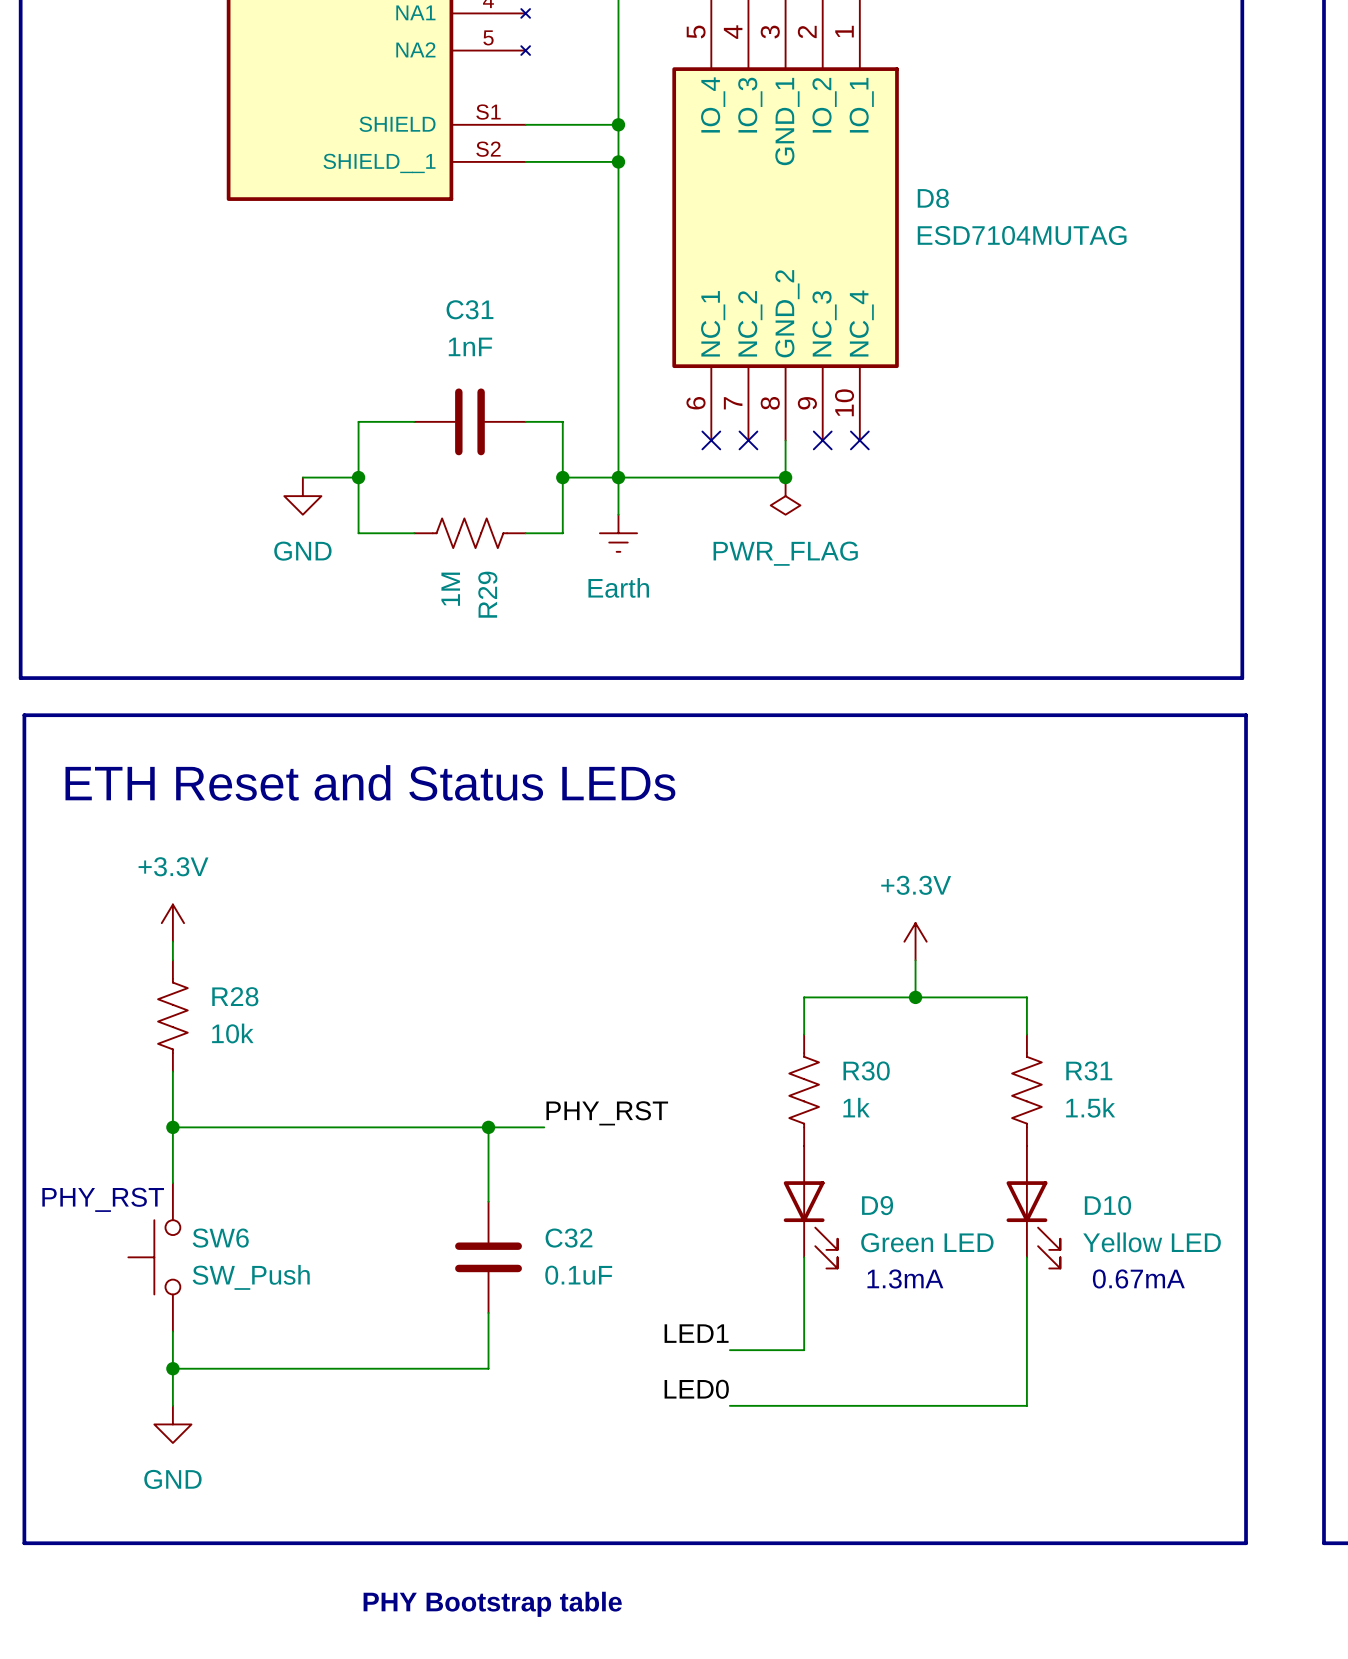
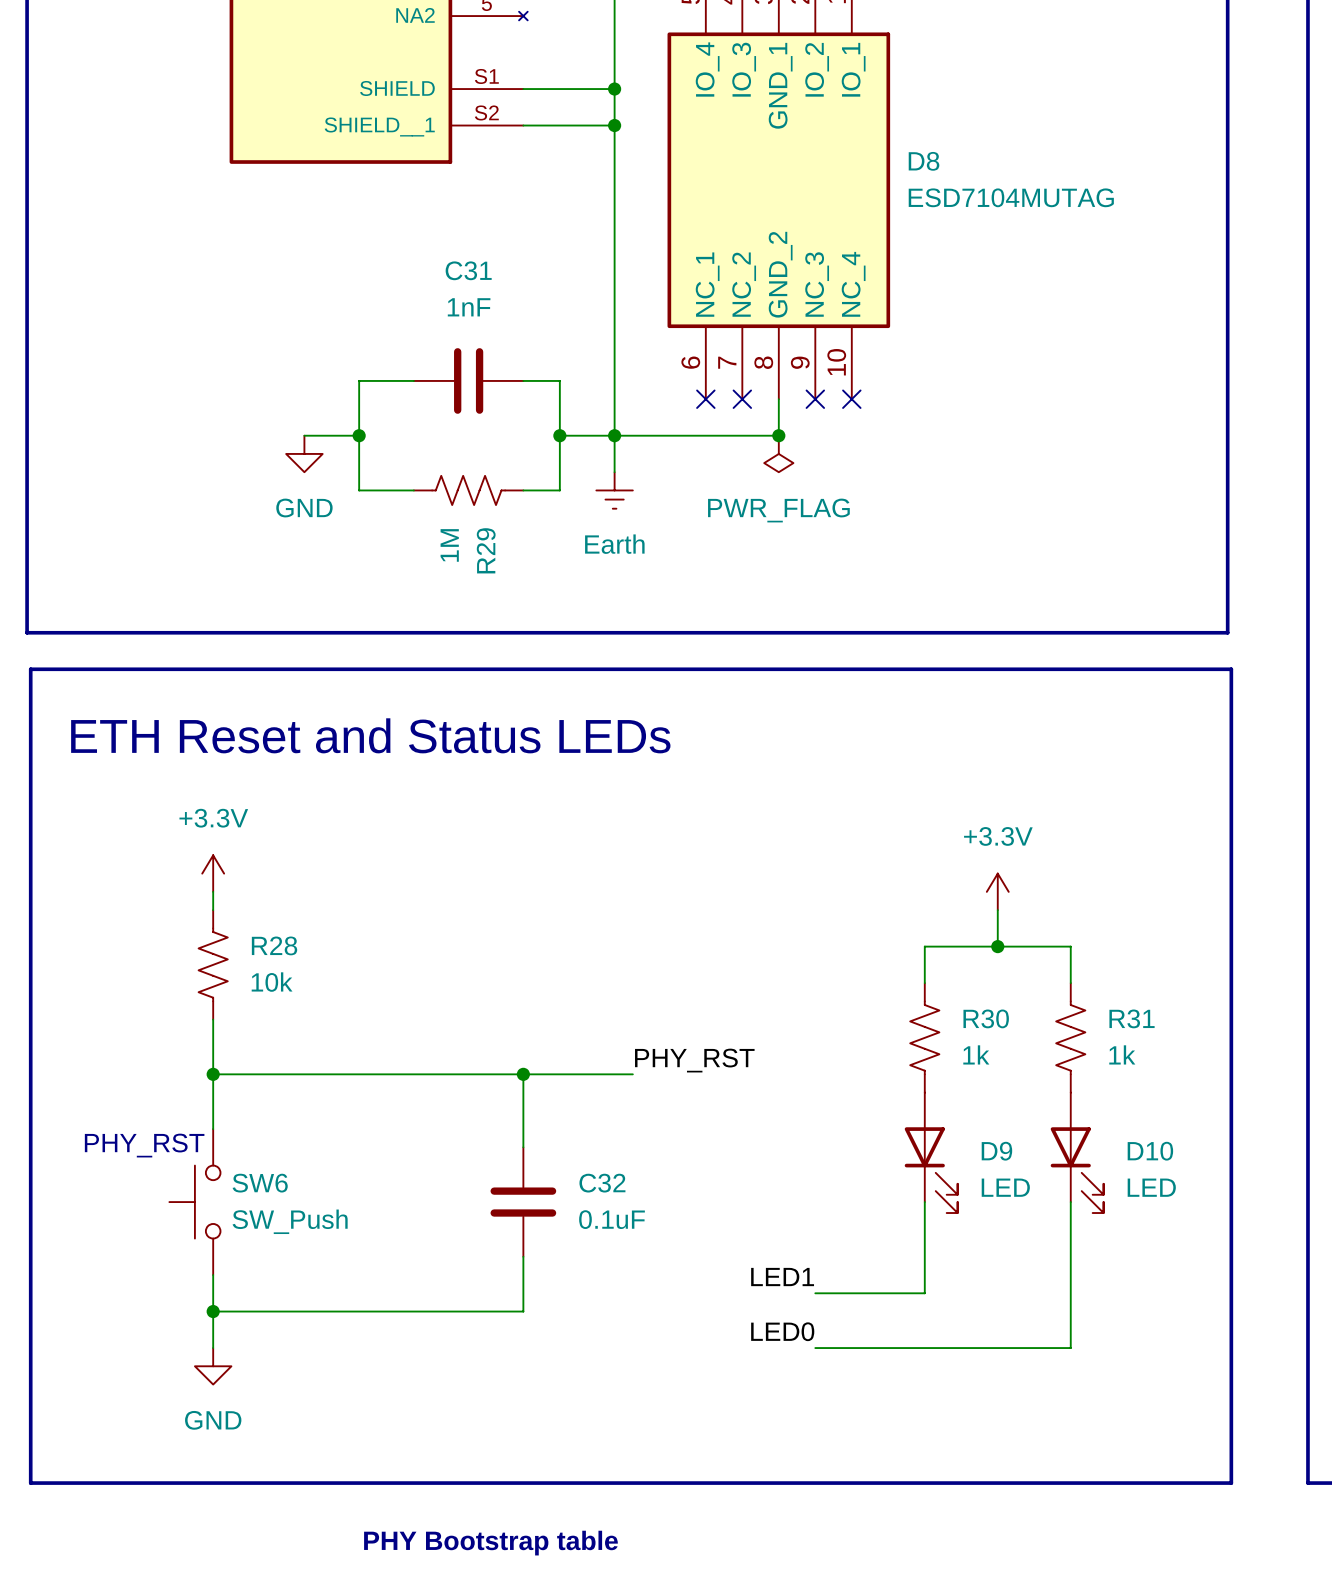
power symbol position: +3.3V (172, 923) -> +3.3V (213, 873)
wire: (172, 941) (172, 960) -> (213, 891) (213, 910)
power symbol position: +3.3V (915, 941) -> +3.3V (997, 891)
wire: (915, 960) (915, 997) -> (997, 910) (997, 946)
junction: (915, 997) -> none
wire: (934, 997) (804, 997) (804, 1034) -> (924, 946) (924, 983)
junction: none -> (997, 946)
wire: (1026, 997) (1026, 1034) -> (1016, 946) (1070, 946) (1070, 983)
R28 position: (172, 1015) -> (213, 964)
wire: (172, 1071) (172, 1183) -> (213, 1019) (213, 1129)
R30 position: (804, 1090) -> (924, 1037)
R31 position: (1026, 1090) -> (1070, 1037)
R31 value: 1.5k (1090, 1107) -> 1k (1122, 1054)
label position: PHY_RST (607, 1113) -> PHY_RST (694, 1060)
wire: (172, 1127) (210, 1127) -> none
junction position: (172, 1127) -> (213, 1074)
wire: (488, 1127) (488, 1201) -> (523, 1074) (523, 1147)
junction position: (488, 1127) -> (523, 1074)
text position: PHY_RST (103, 1199) -> PHY_RST (144, 1145)
D9 position: (810, 1207) -> (931, 1152)
D10 position: (1033, 1207) -> (1077, 1152)
D9 value: Green LED (927, 1242) -> LED (1005, 1187)
D10 value: Yellow LED (1152, 1242) -> LED (1151, 1187)
SW6 position: (154, 1257) -> (194, 1202)
C32 position: (488, 1257) -> (523, 1202)
wire: (804, 1257) (804, 1350) (729, 1350) -> none
wire: none -> (924, 1202) (924, 1293) (815, 1293)
wire: (1026, 1257) (1026, 1405) -> (1070, 1202) (1070, 1348) (1016, 1348)
text: 1.3mA (905, 1278) -> none
text: 0.67mA (1138, 1278) -> none
wire: (488, 1313) (488, 1368) -> (523, 1256) (523, 1311) (486, 1311)
wire: (172, 1331) (172, 1405) -> (213, 1275) (213, 1348)
label position: LED1 (696, 1333) -> LED1 (782, 1277)
wire: (172, 1368) (210, 1368) -> none
junction position: (172, 1368) -> (213, 1311)
label position: LED0 (696, 1389) -> LED0 (782, 1331)
wire: (729, 1405) (822, 1405) -> (541, 1074) (632, 1074)
power symbol position: GND (172, 1424) -> GND (213, 1366)

